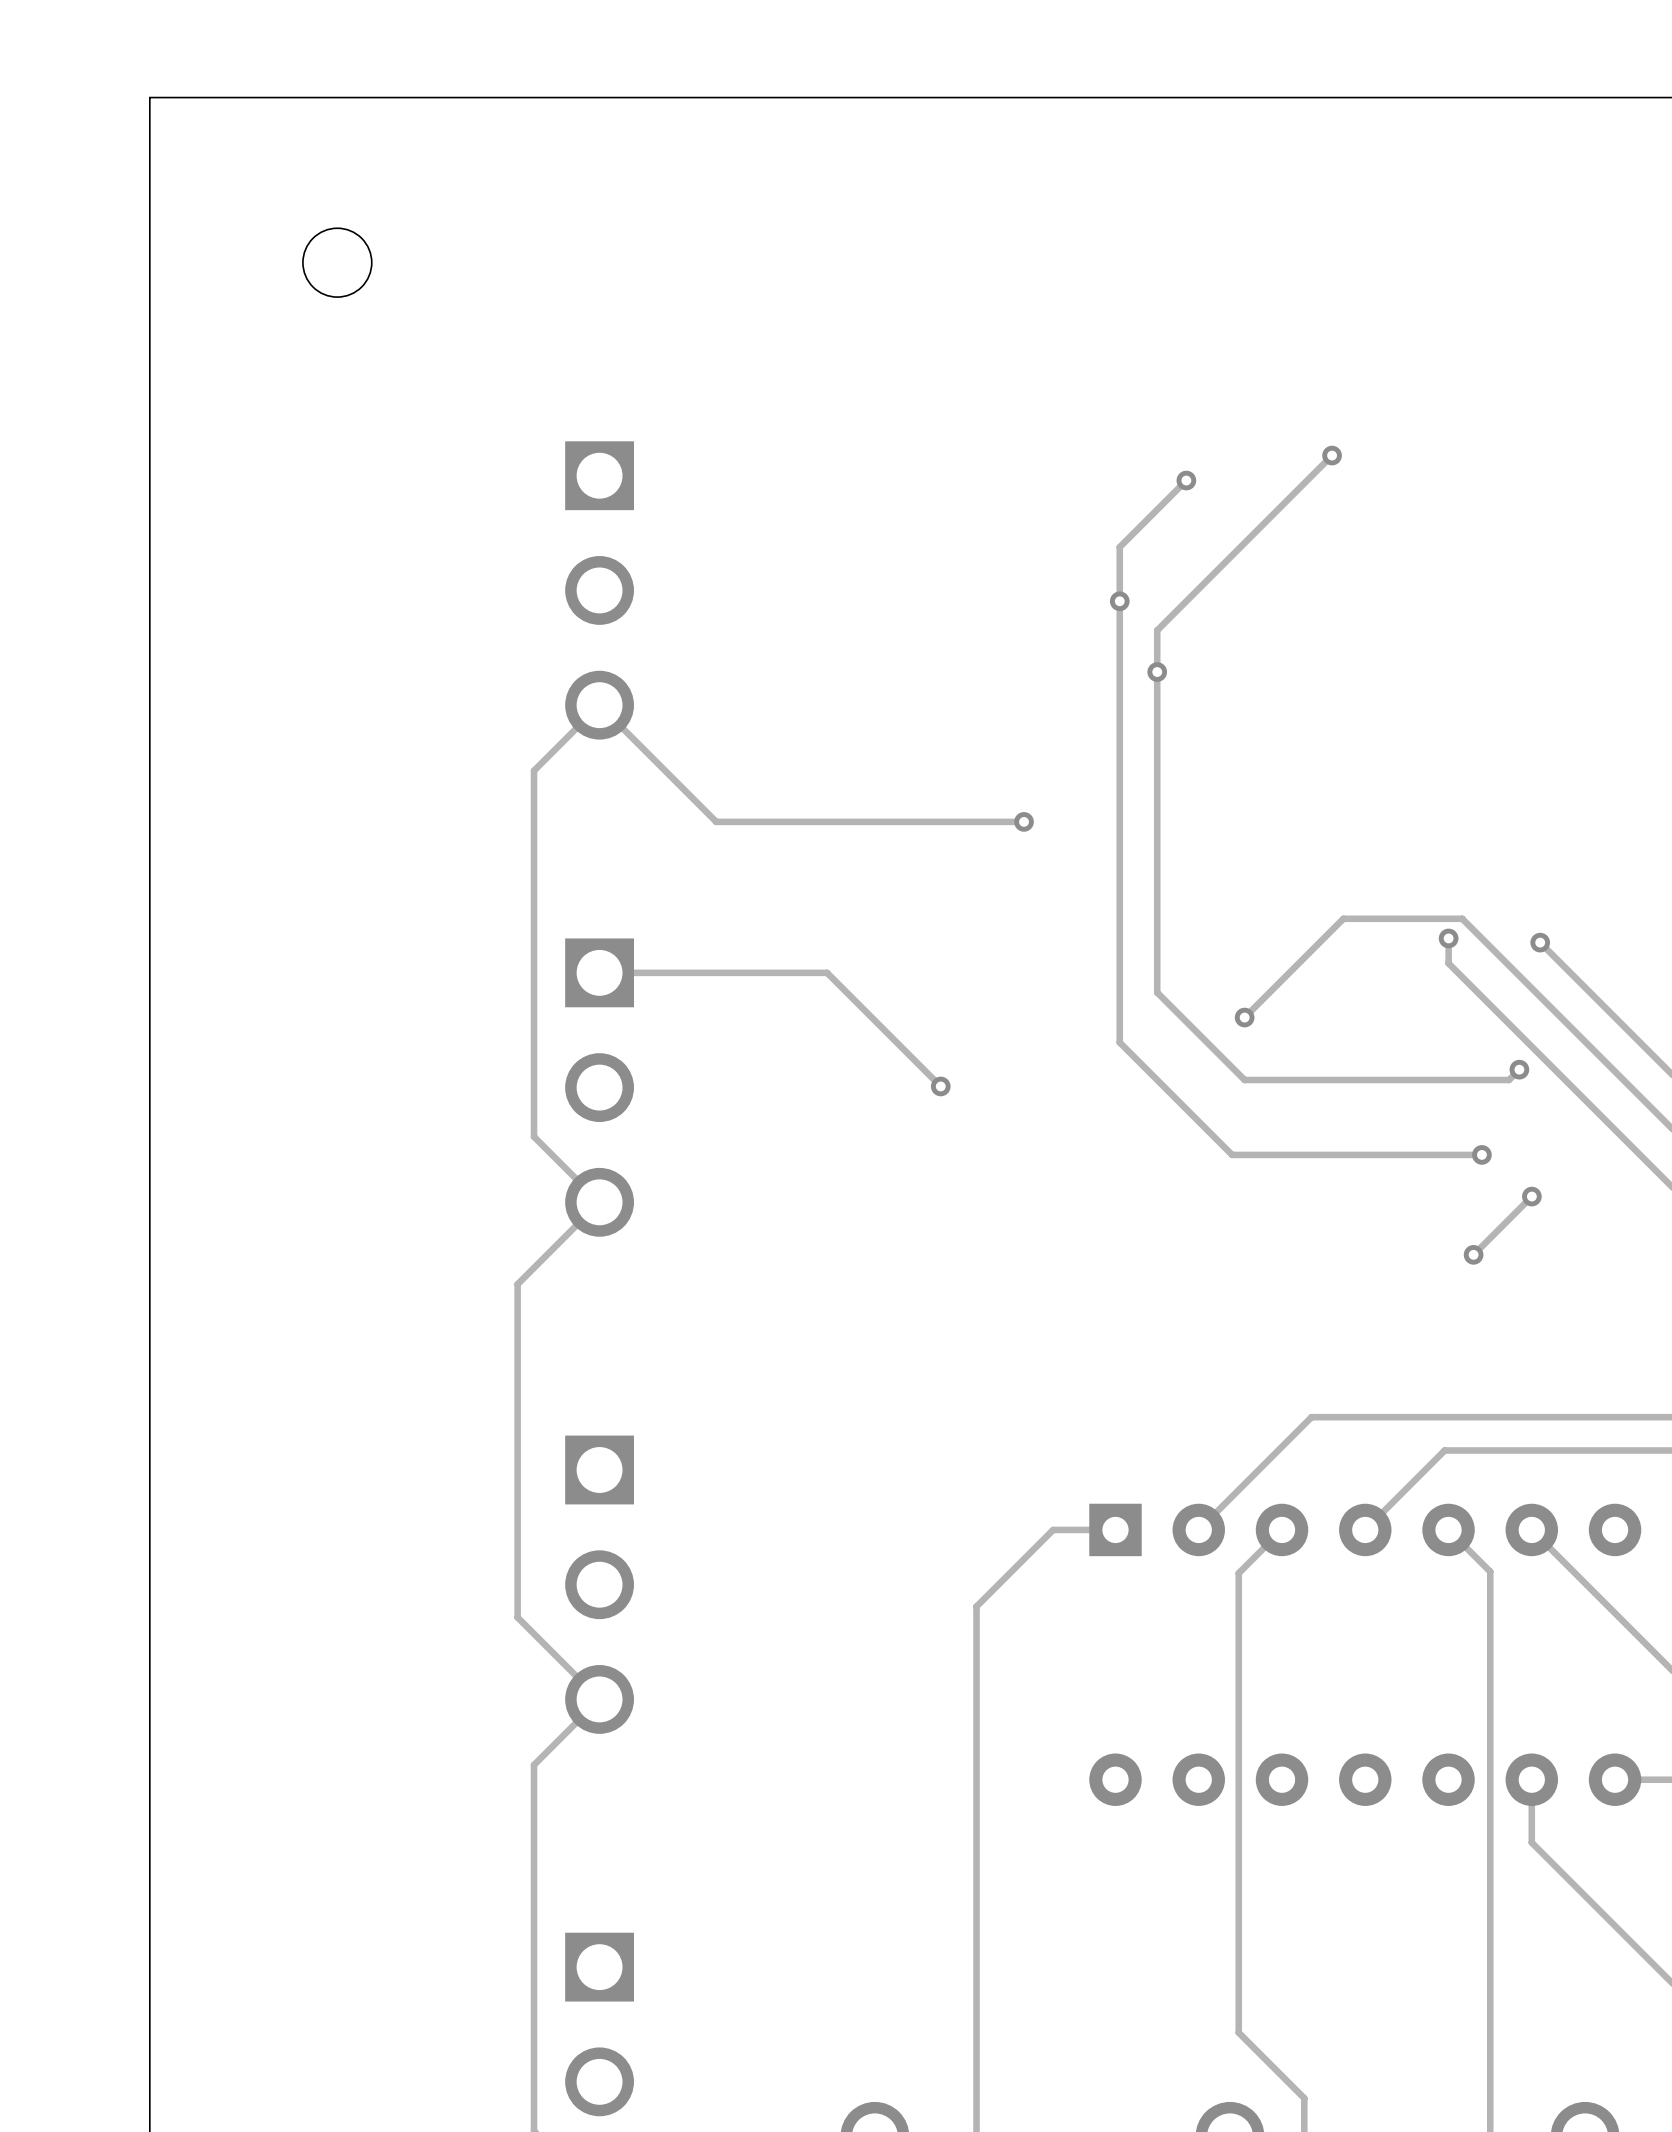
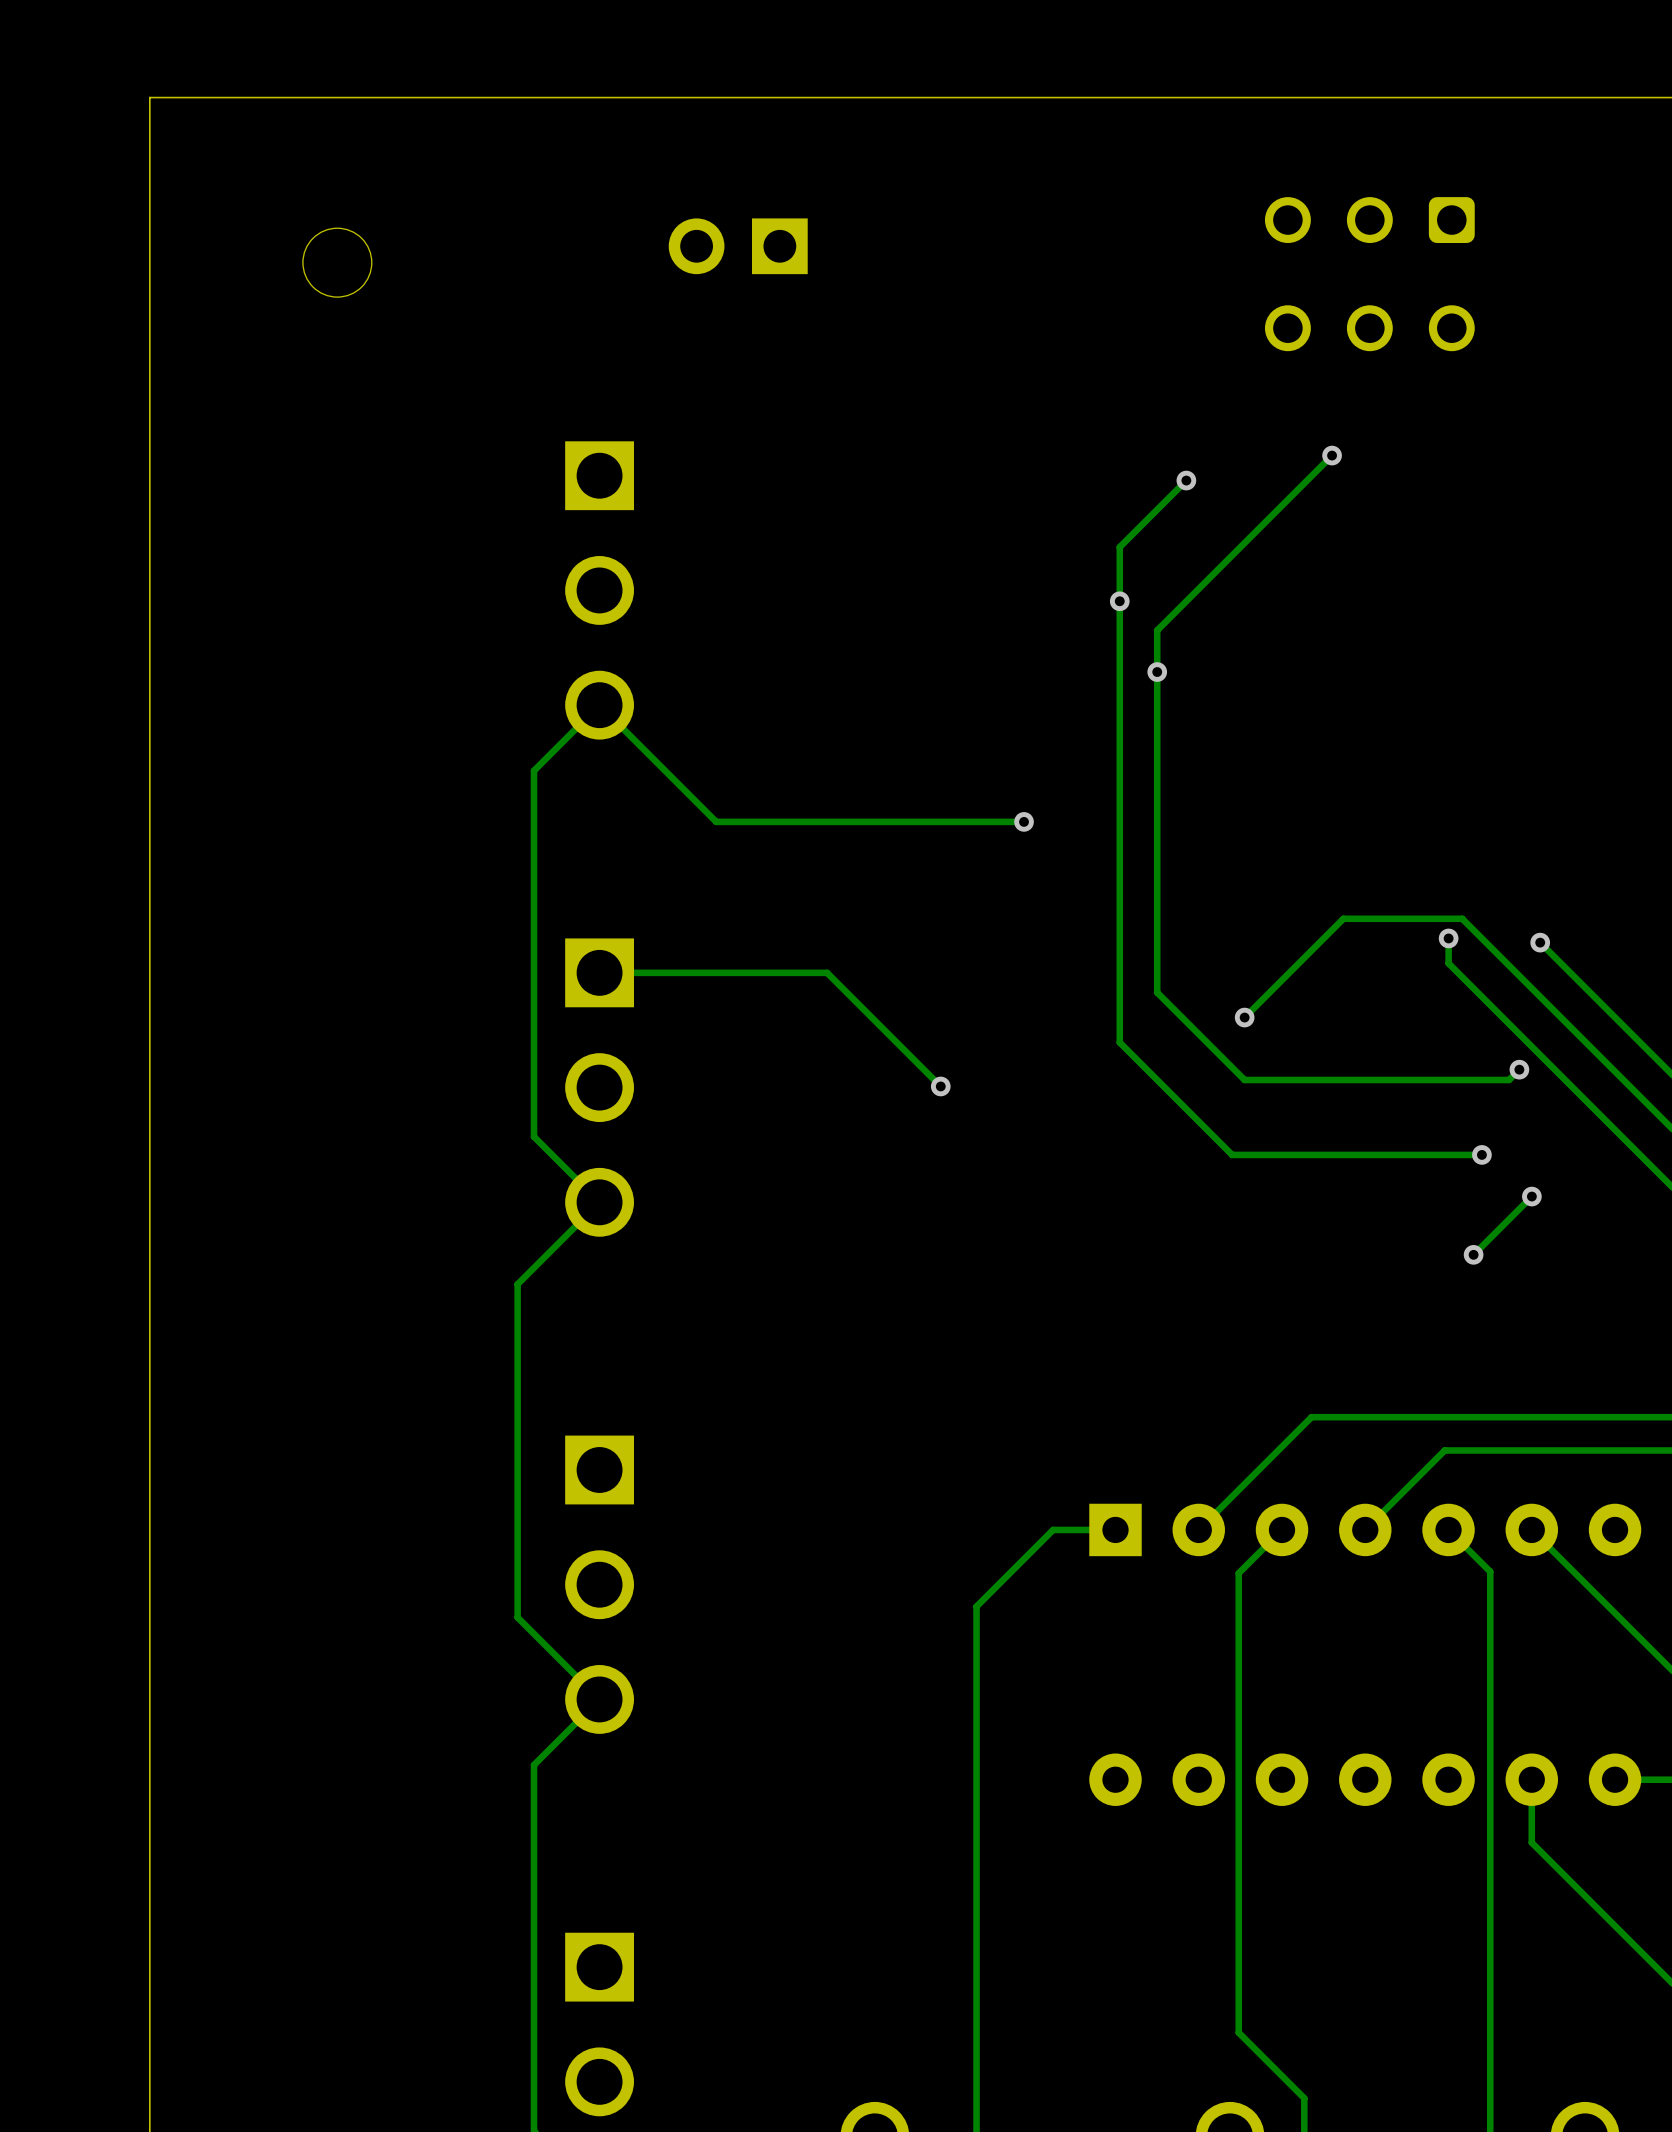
part: none -> (738, 246)
part: none -> (1369, 274)

